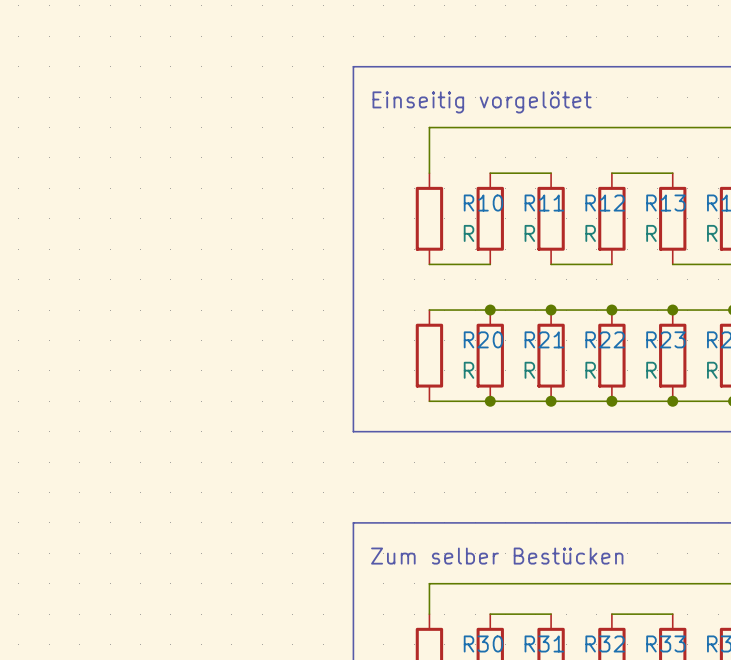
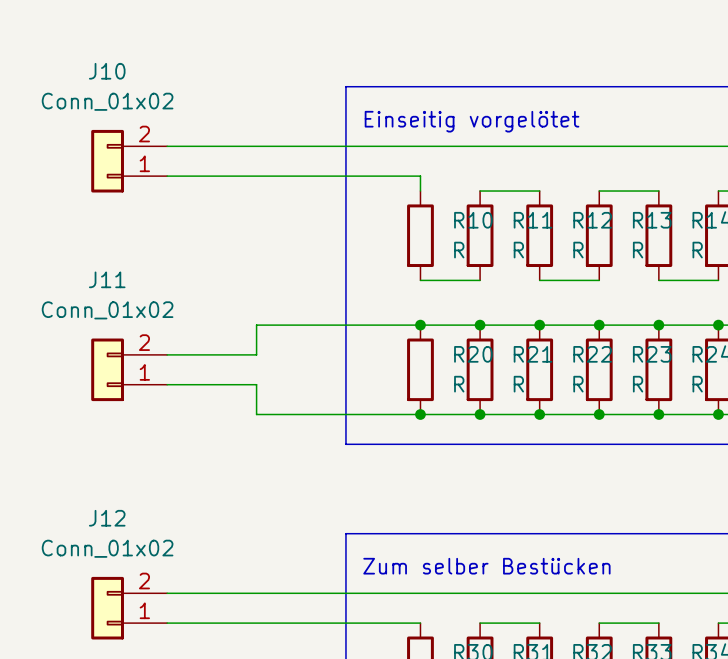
wire: (429, 127) (429, 157) -> (420, 146) (167, 146)
J10: none -> Conn_01x02 (129, 161)
wire: none -> (167, 176) (420, 176)
wire: none -> (420, 325) (256, 325) (256, 354) (167, 354)
junction: none -> (420, 325)
J11: none -> Conn_01x02 (129, 369)
wire: none -> (167, 384) (256, 384) (256, 414) (420, 414)
junction: none -> (420, 414)
wire: (429, 583) (429, 614) -> (420, 593) (167, 593)
J12: none -> Conn_01x02 (129, 608)
wire: none -> (167, 623) (420, 623)

